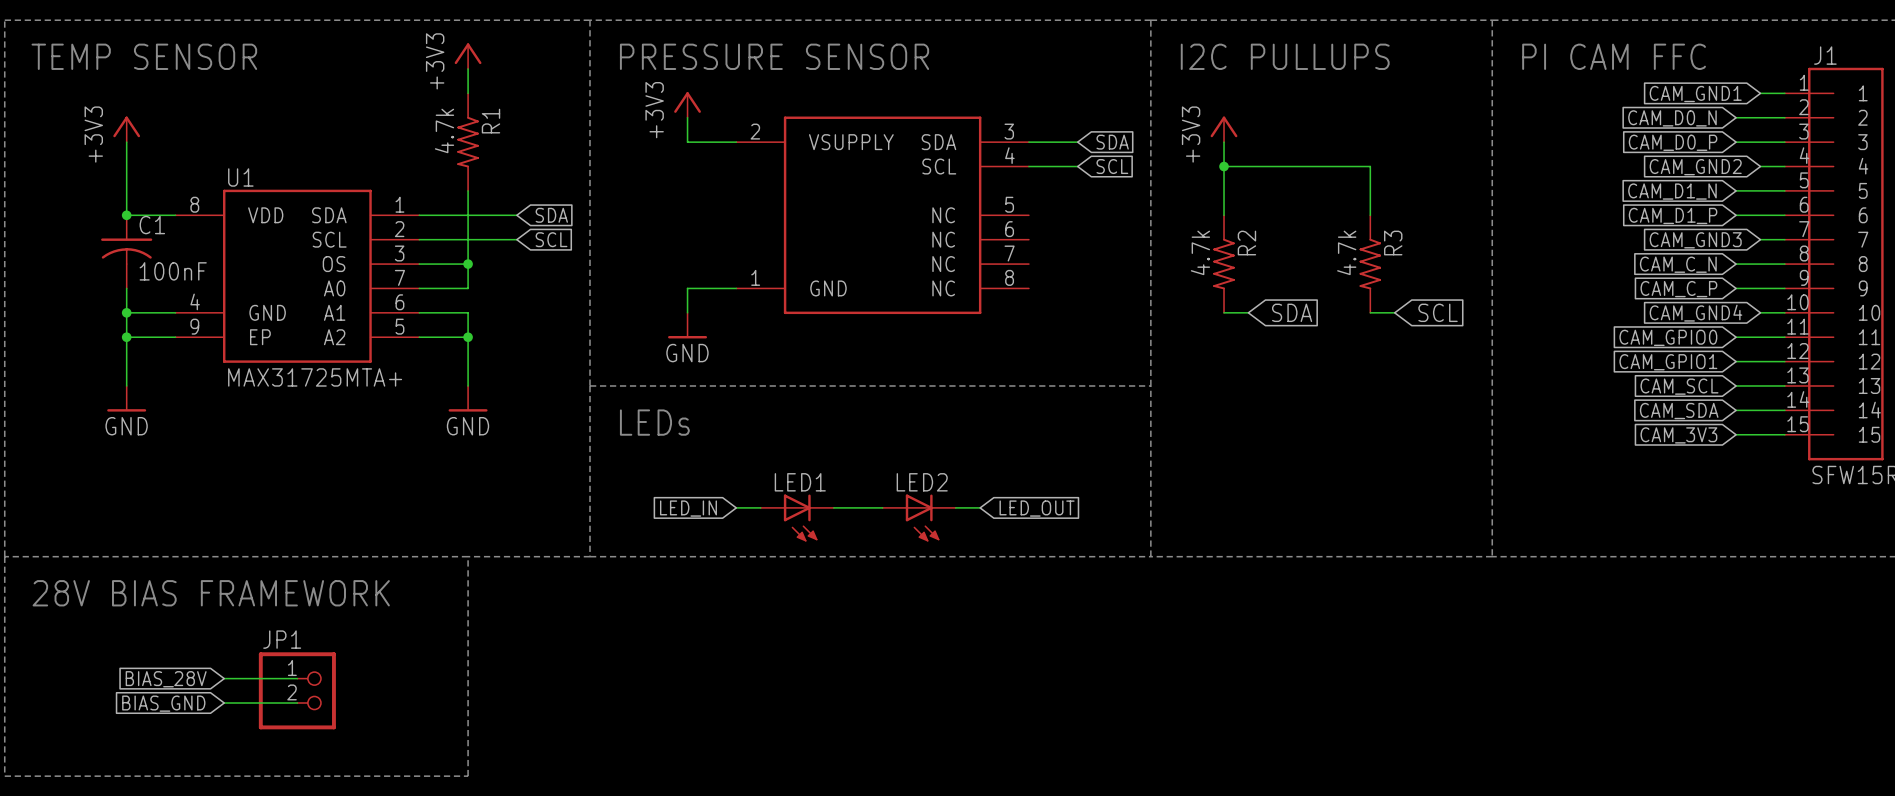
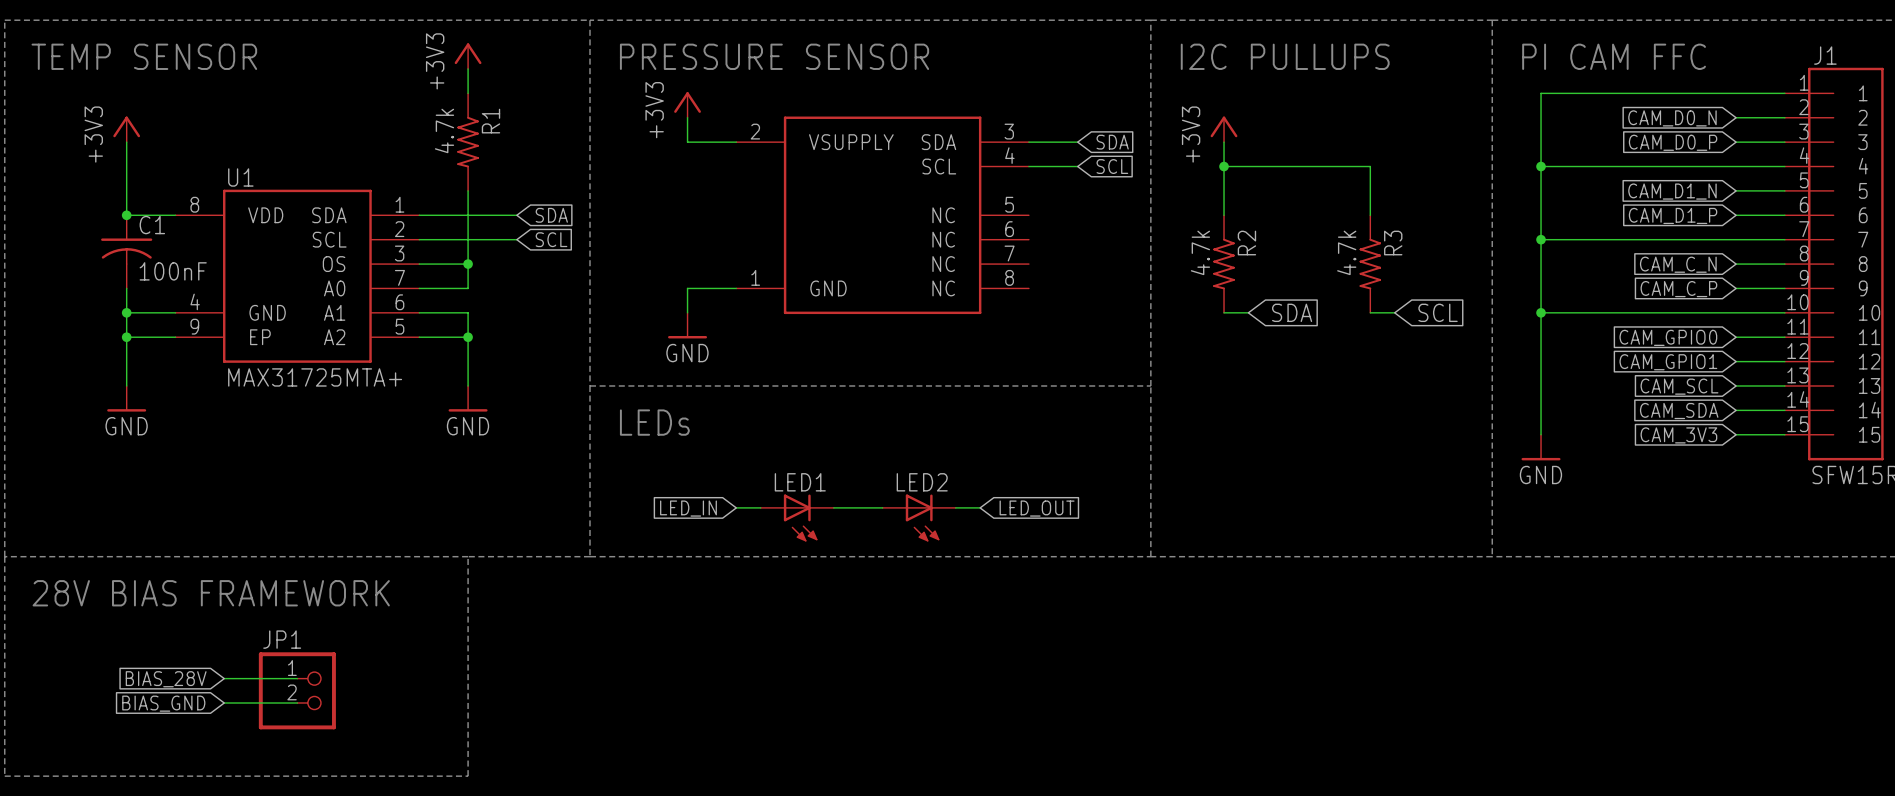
wire: none -> (1760, 93) (1541, 93) (1541, 434)
global label: CAM_GND1 (1695, 94) -> none
wire: none -> (1541, 166) (1760, 166)
junction: none -> (1541, 166)
global label: CAM_GND2 (1695, 167) -> none
wire: none -> (1541, 239) (1760, 239)
junction: none -> (1541, 239)
global label: CAM_GND3 (1695, 240) -> none
wire: none -> (1541, 312) (1760, 312)
junction: none -> (1541, 312)
global label: CAM_GND4 (1695, 313) -> none
power symbol: none -> GND (1541, 447)

